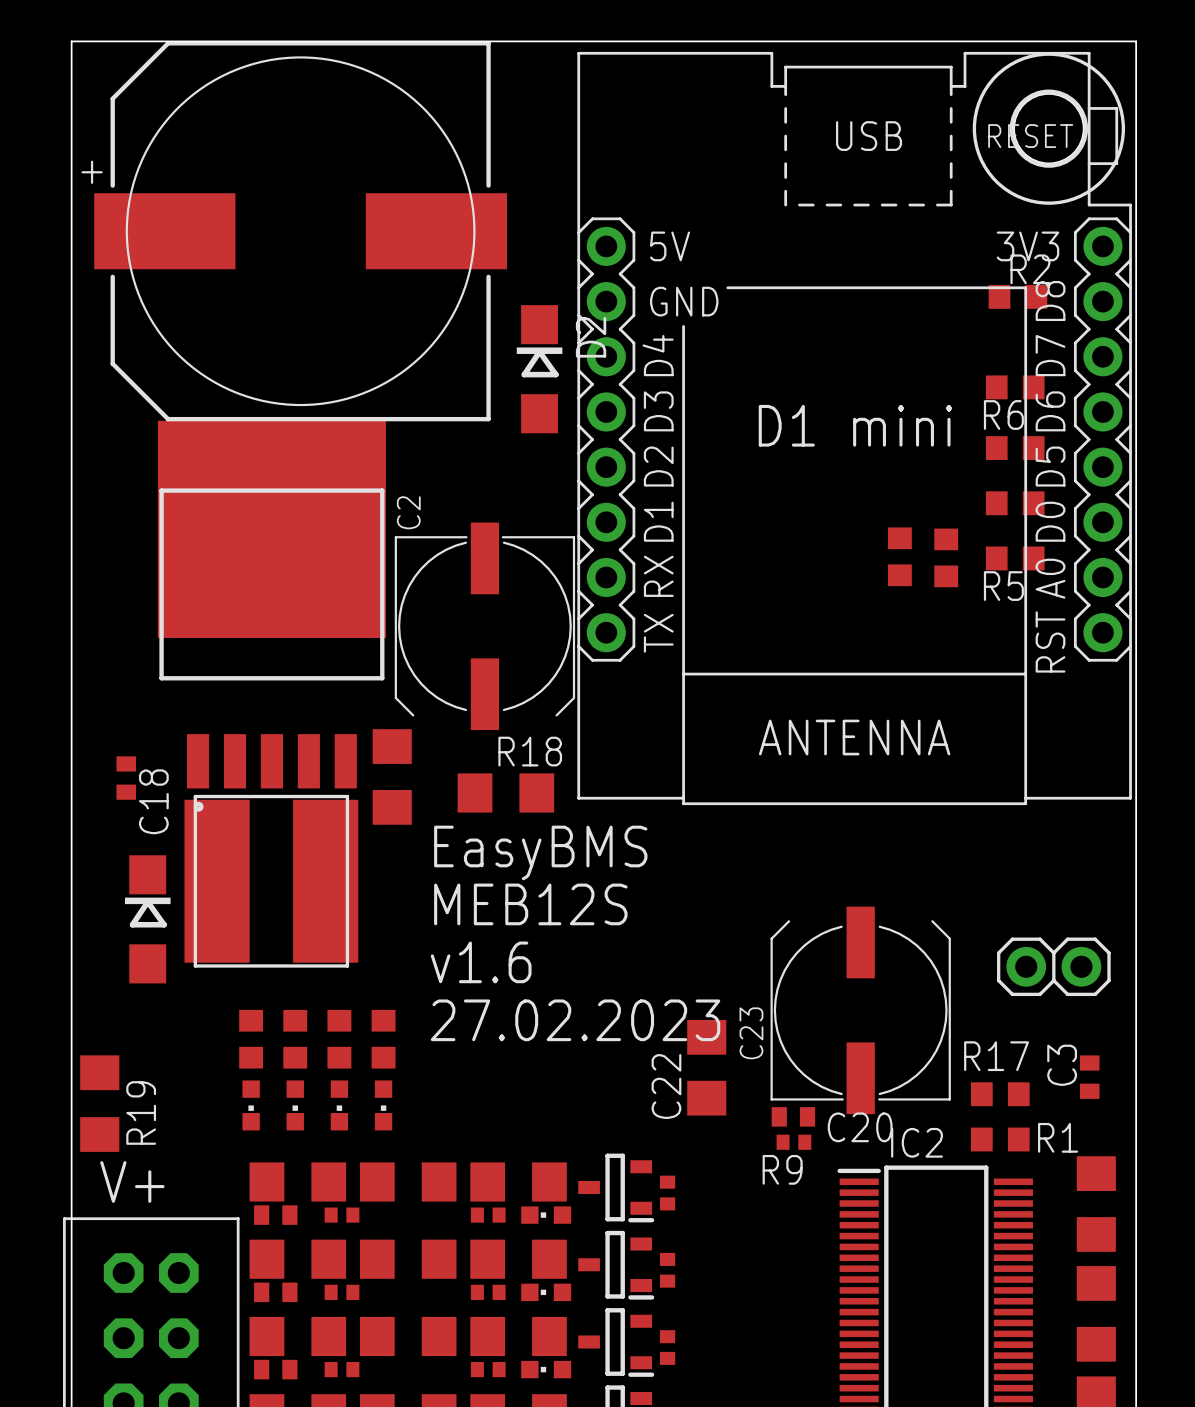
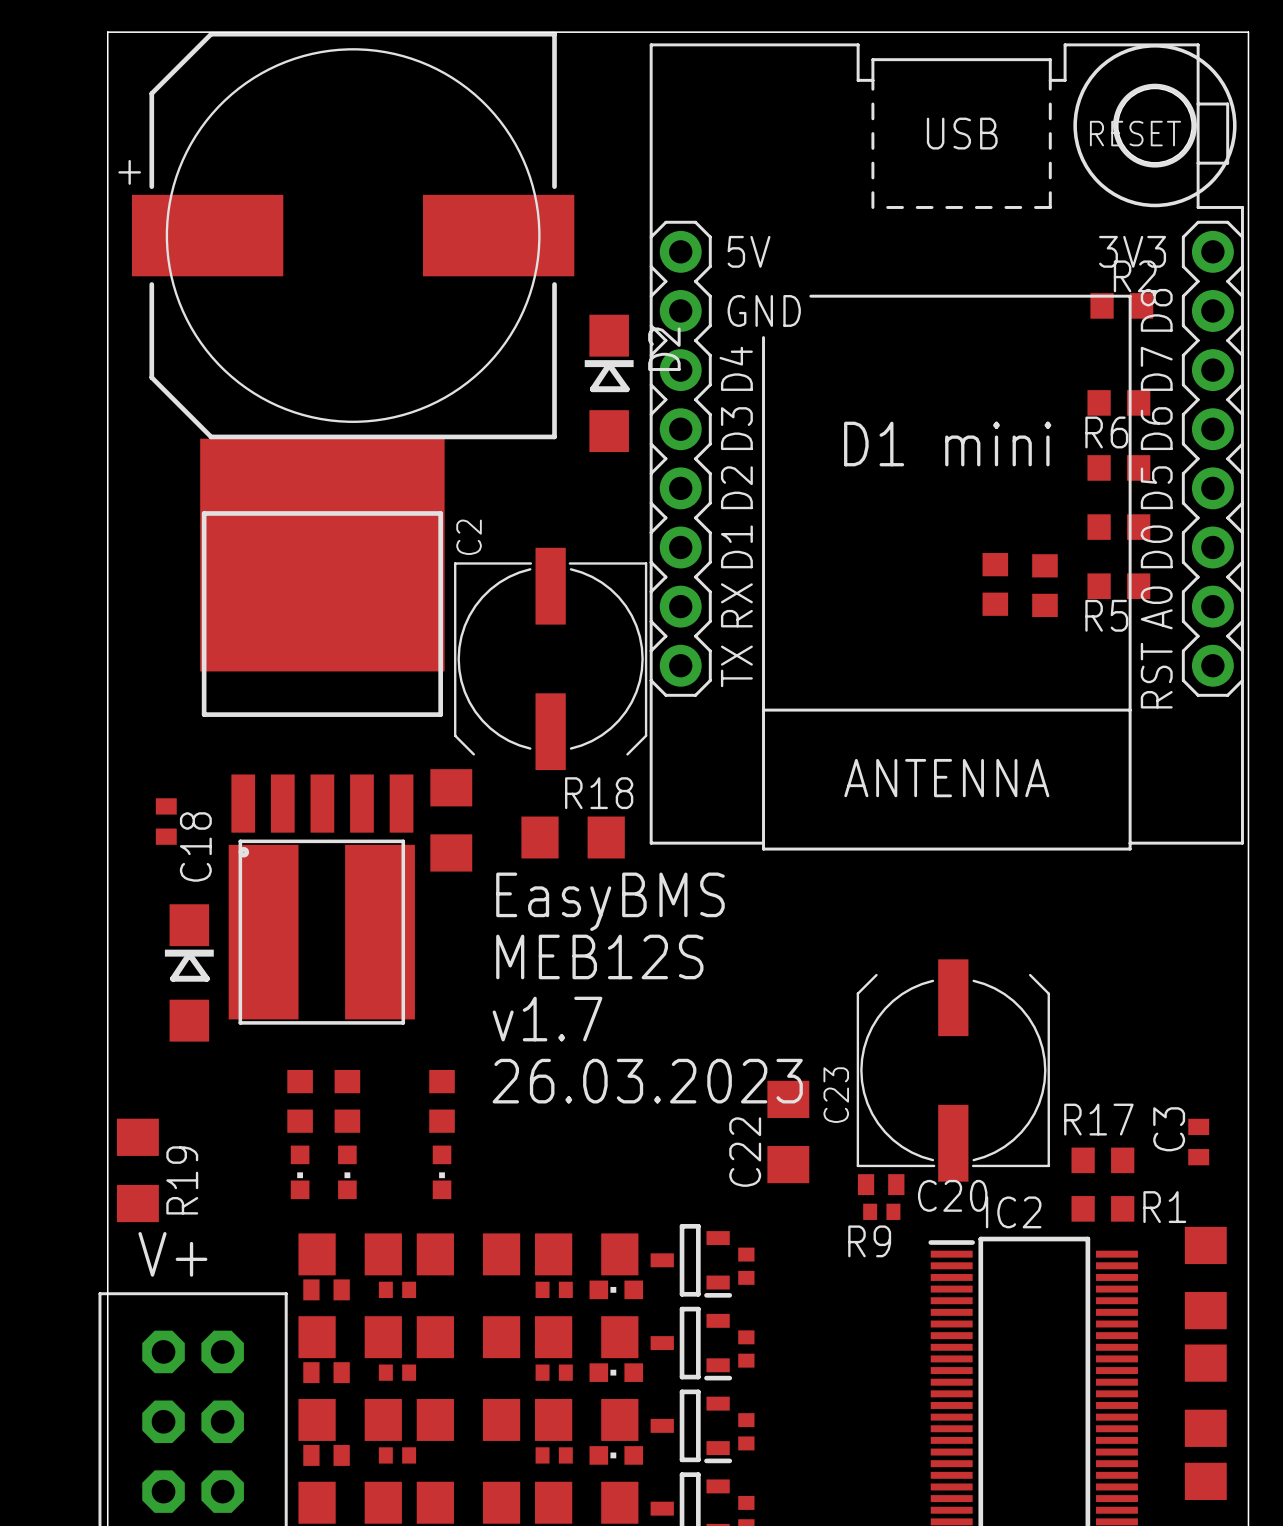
text: v1.6 (481, 962) -> v1.7 (547, 1019)
part: (1053, 966) -> none
text: 27.02.2023 (575, 1020) -> 26.03.2023 (647, 1081)
part: (339, 1039) -> none
part: (339, 1105) -> none

